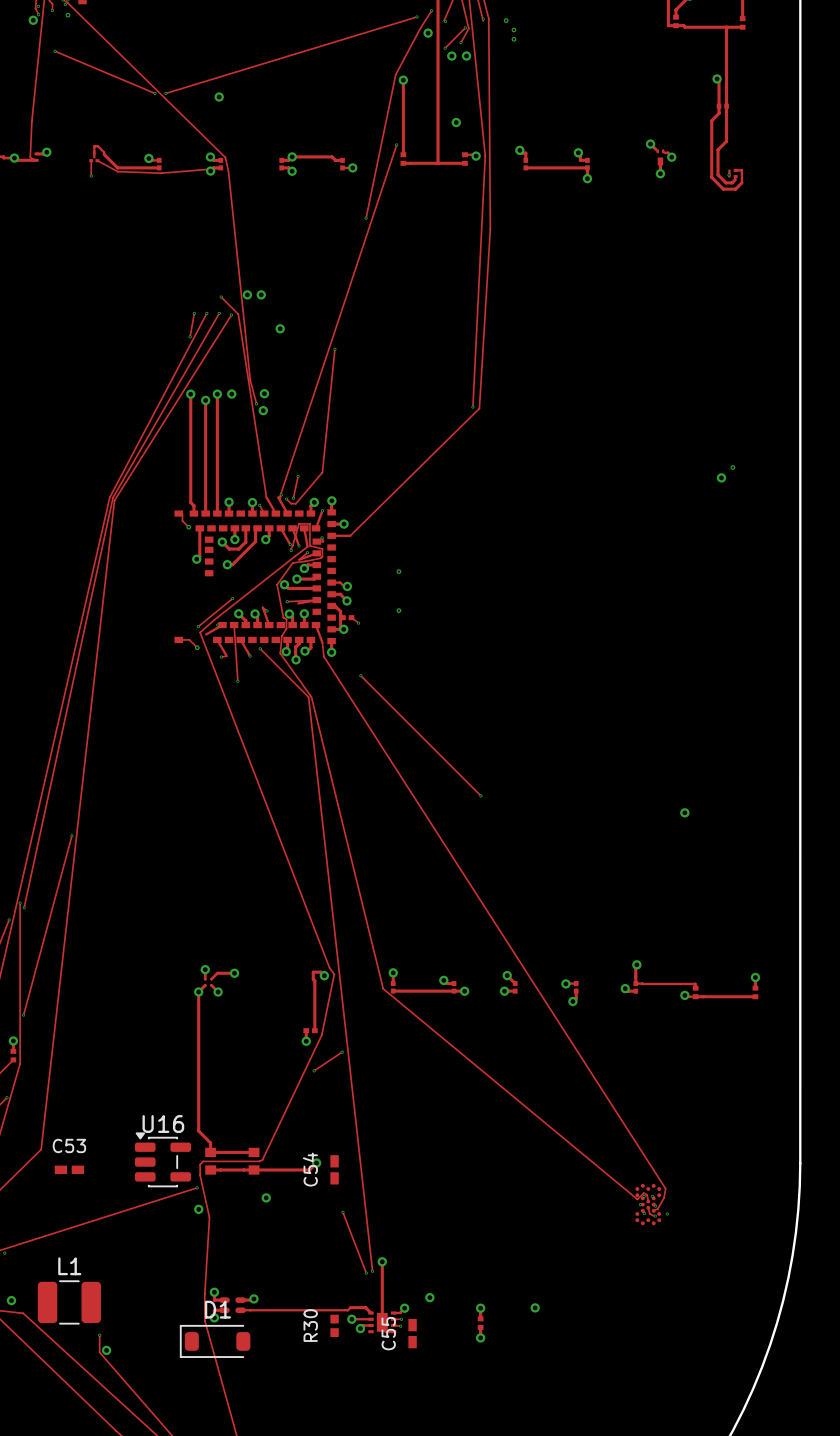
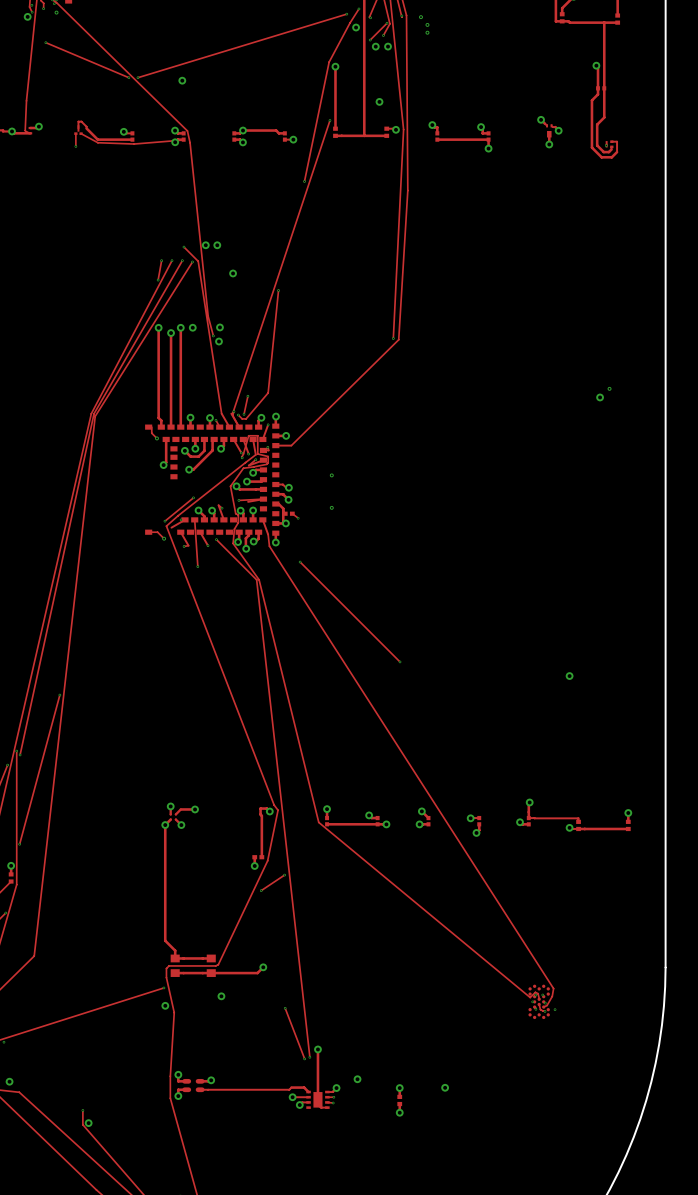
U16: (162, 1159) -> none
C53: (69, 1169) -> none
C54: (334, 1169) -> none
L1: (69, 1302) -> none
R30: (334, 1325) -> none
C55: (412, 1333) -> none
D1: (215, 1341) -> none

